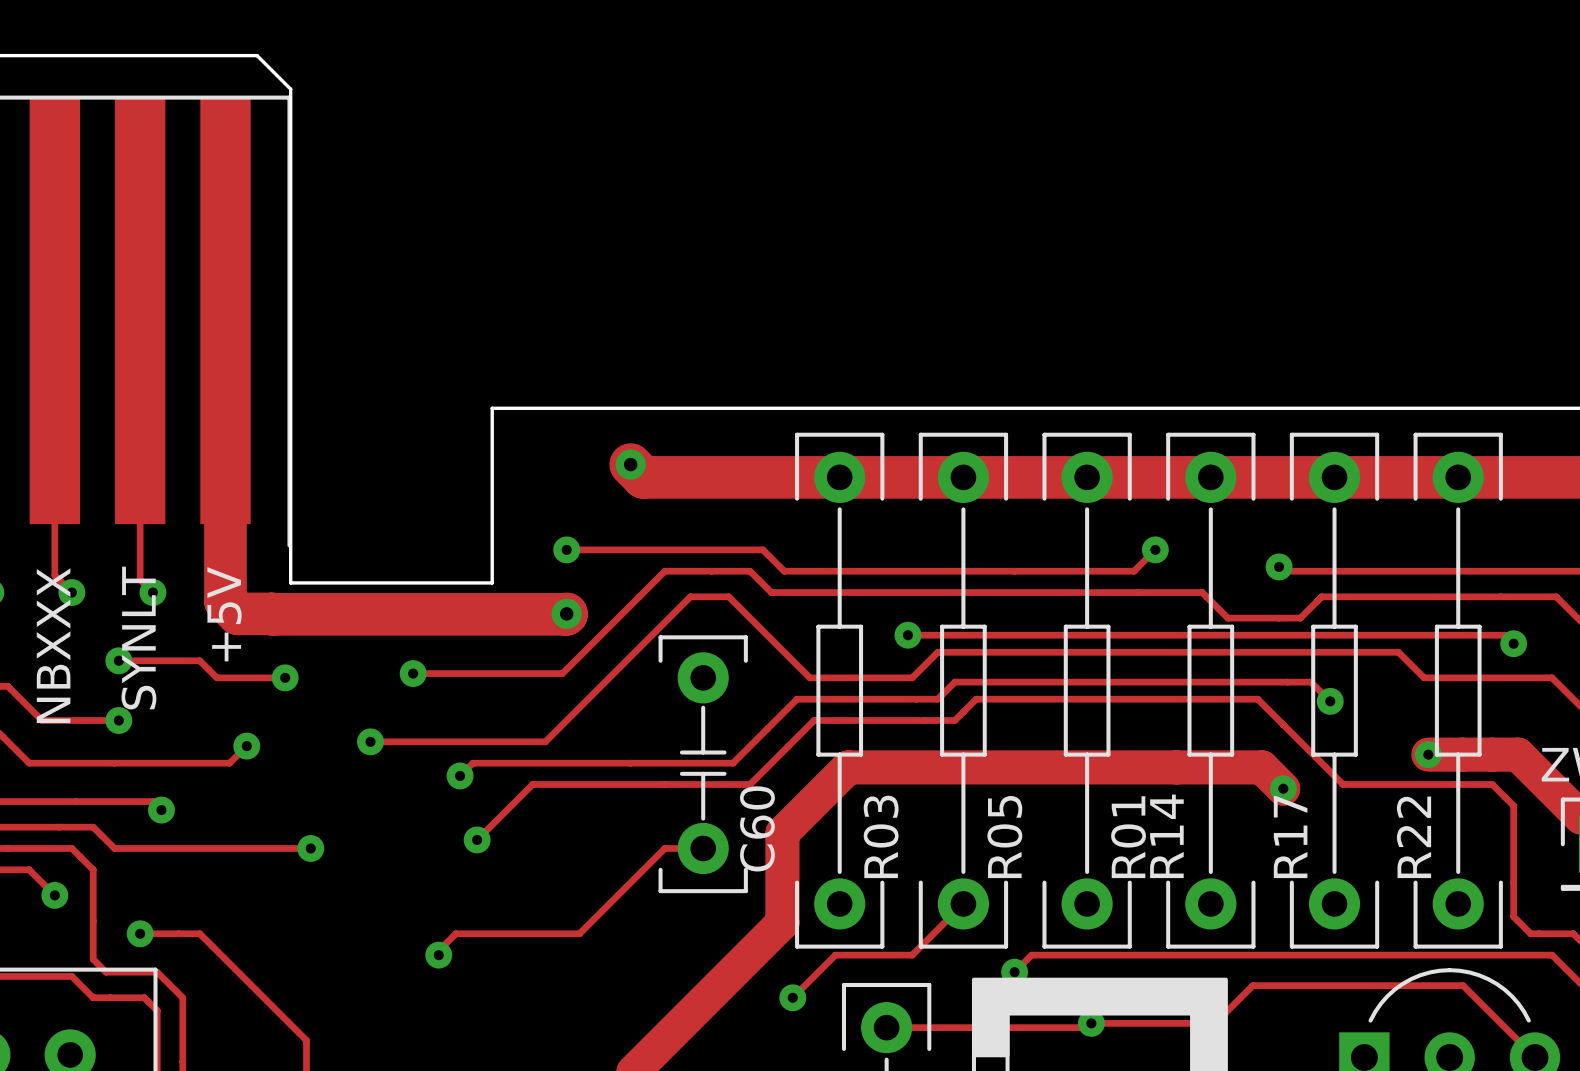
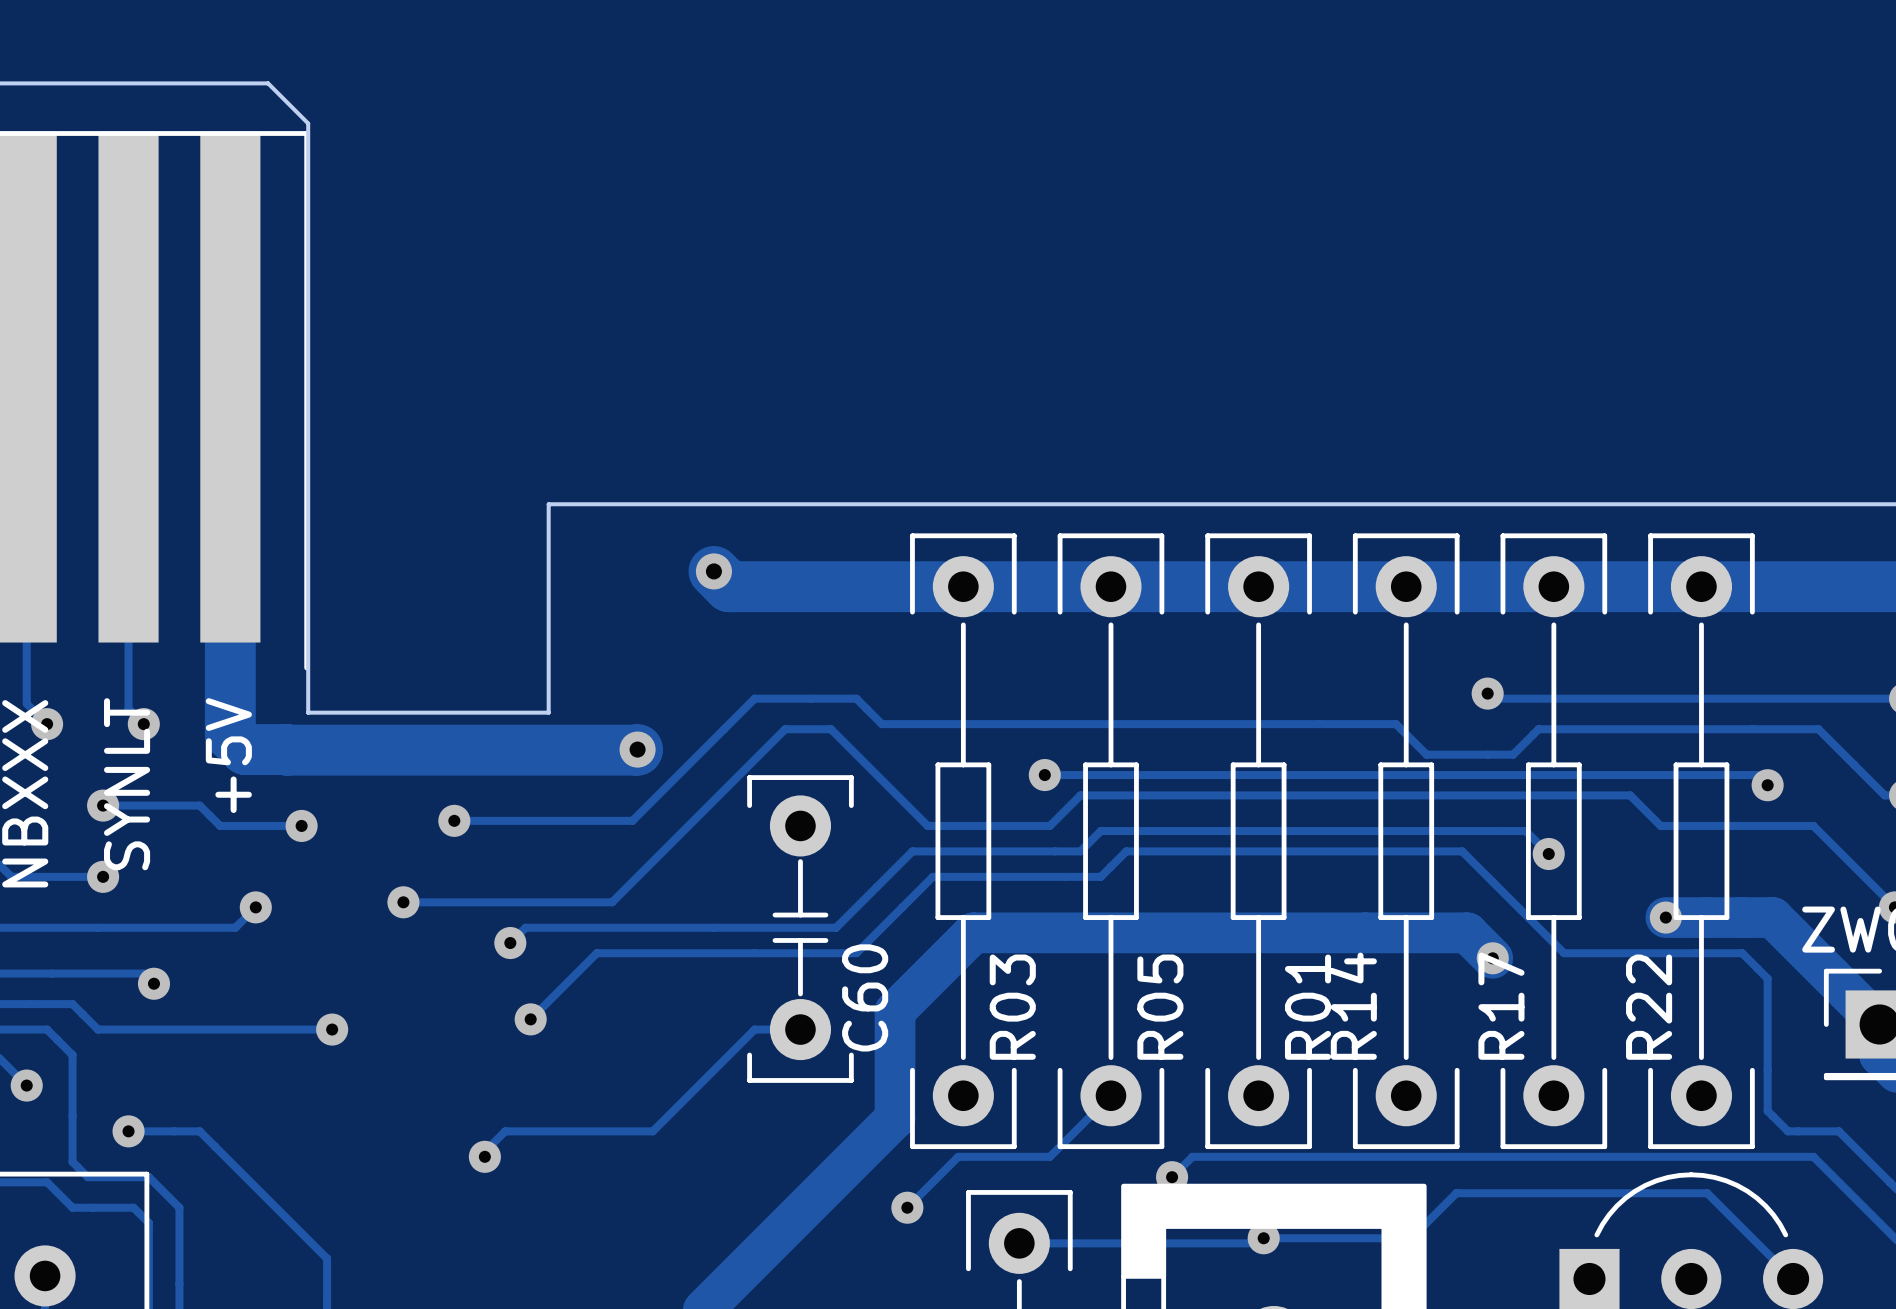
track: (566, 549) (762, 549) (784, 571) (1134, 571) (1155, 549) -> none
via: (566, 549) -> none
via: (1155, 549) -> none

